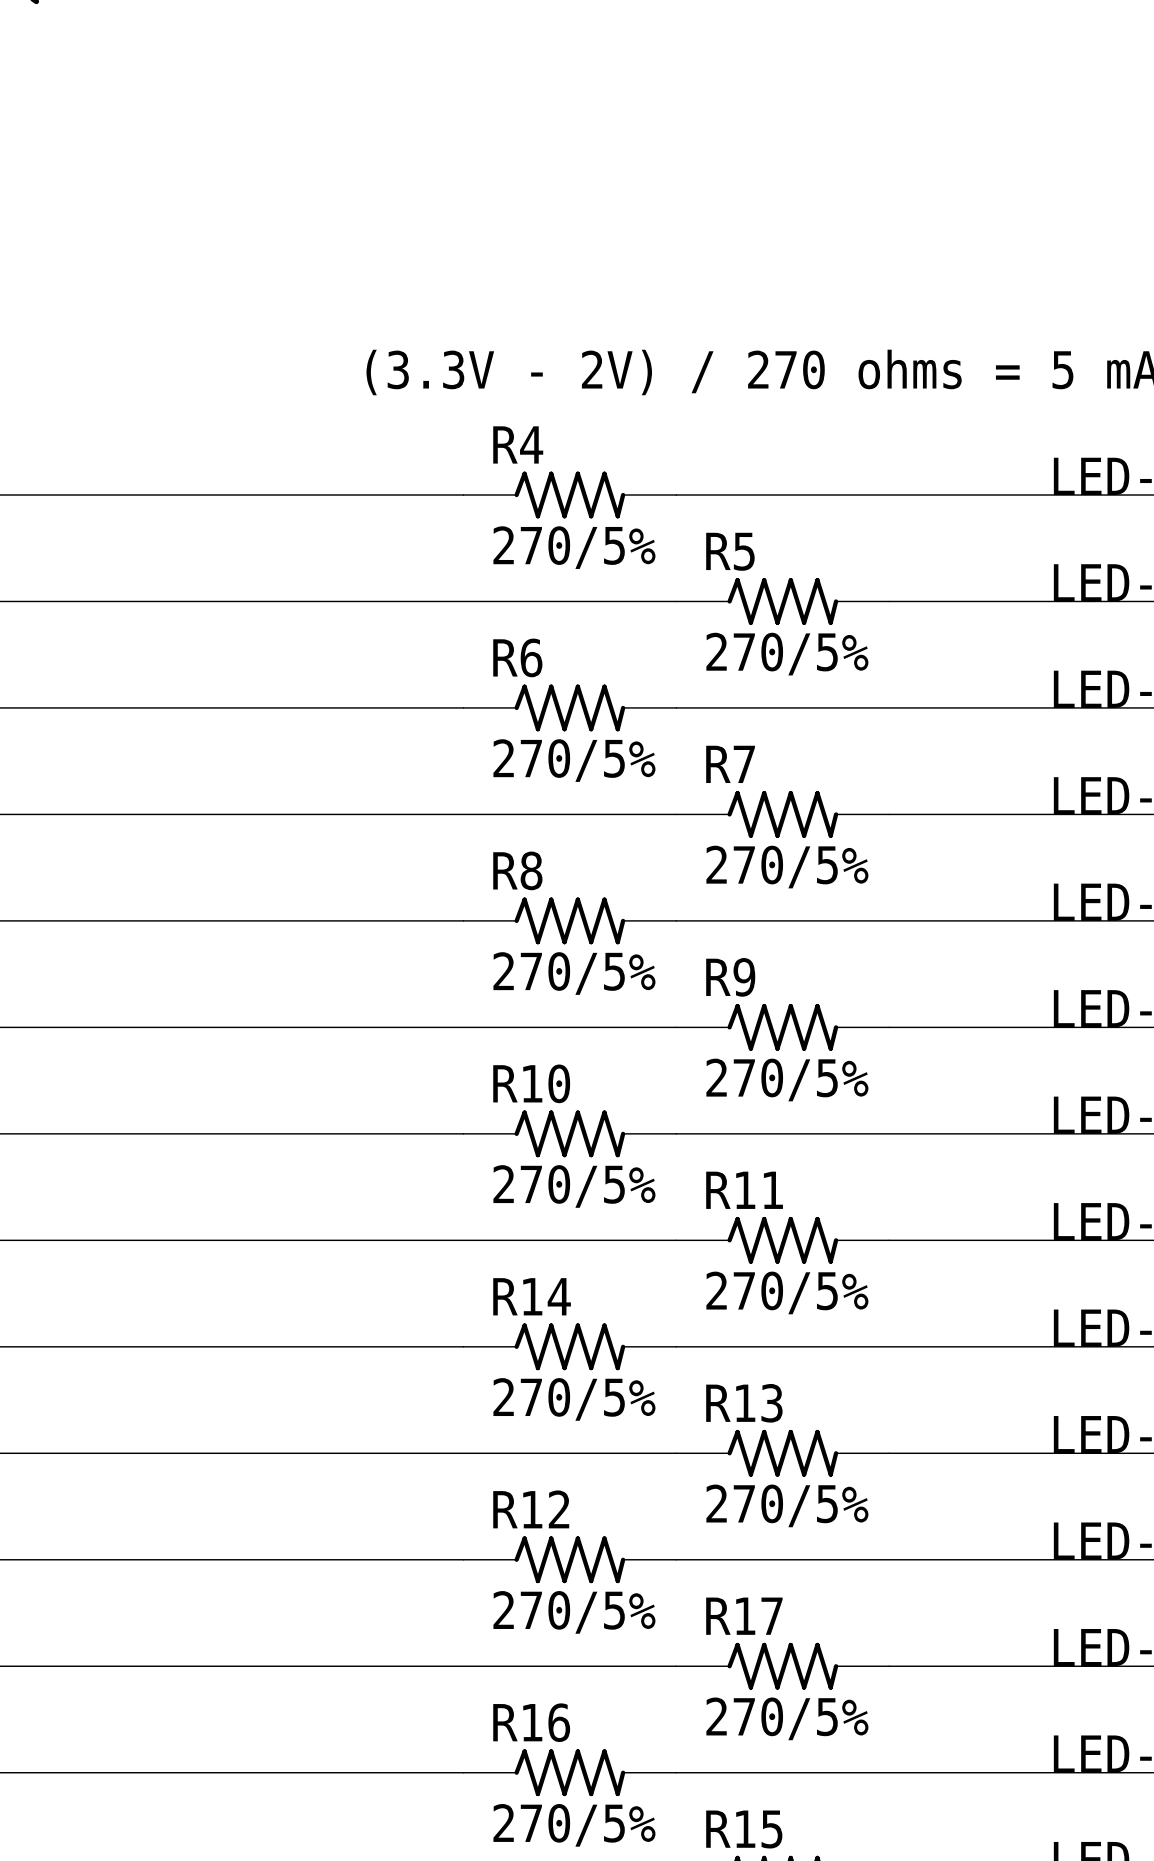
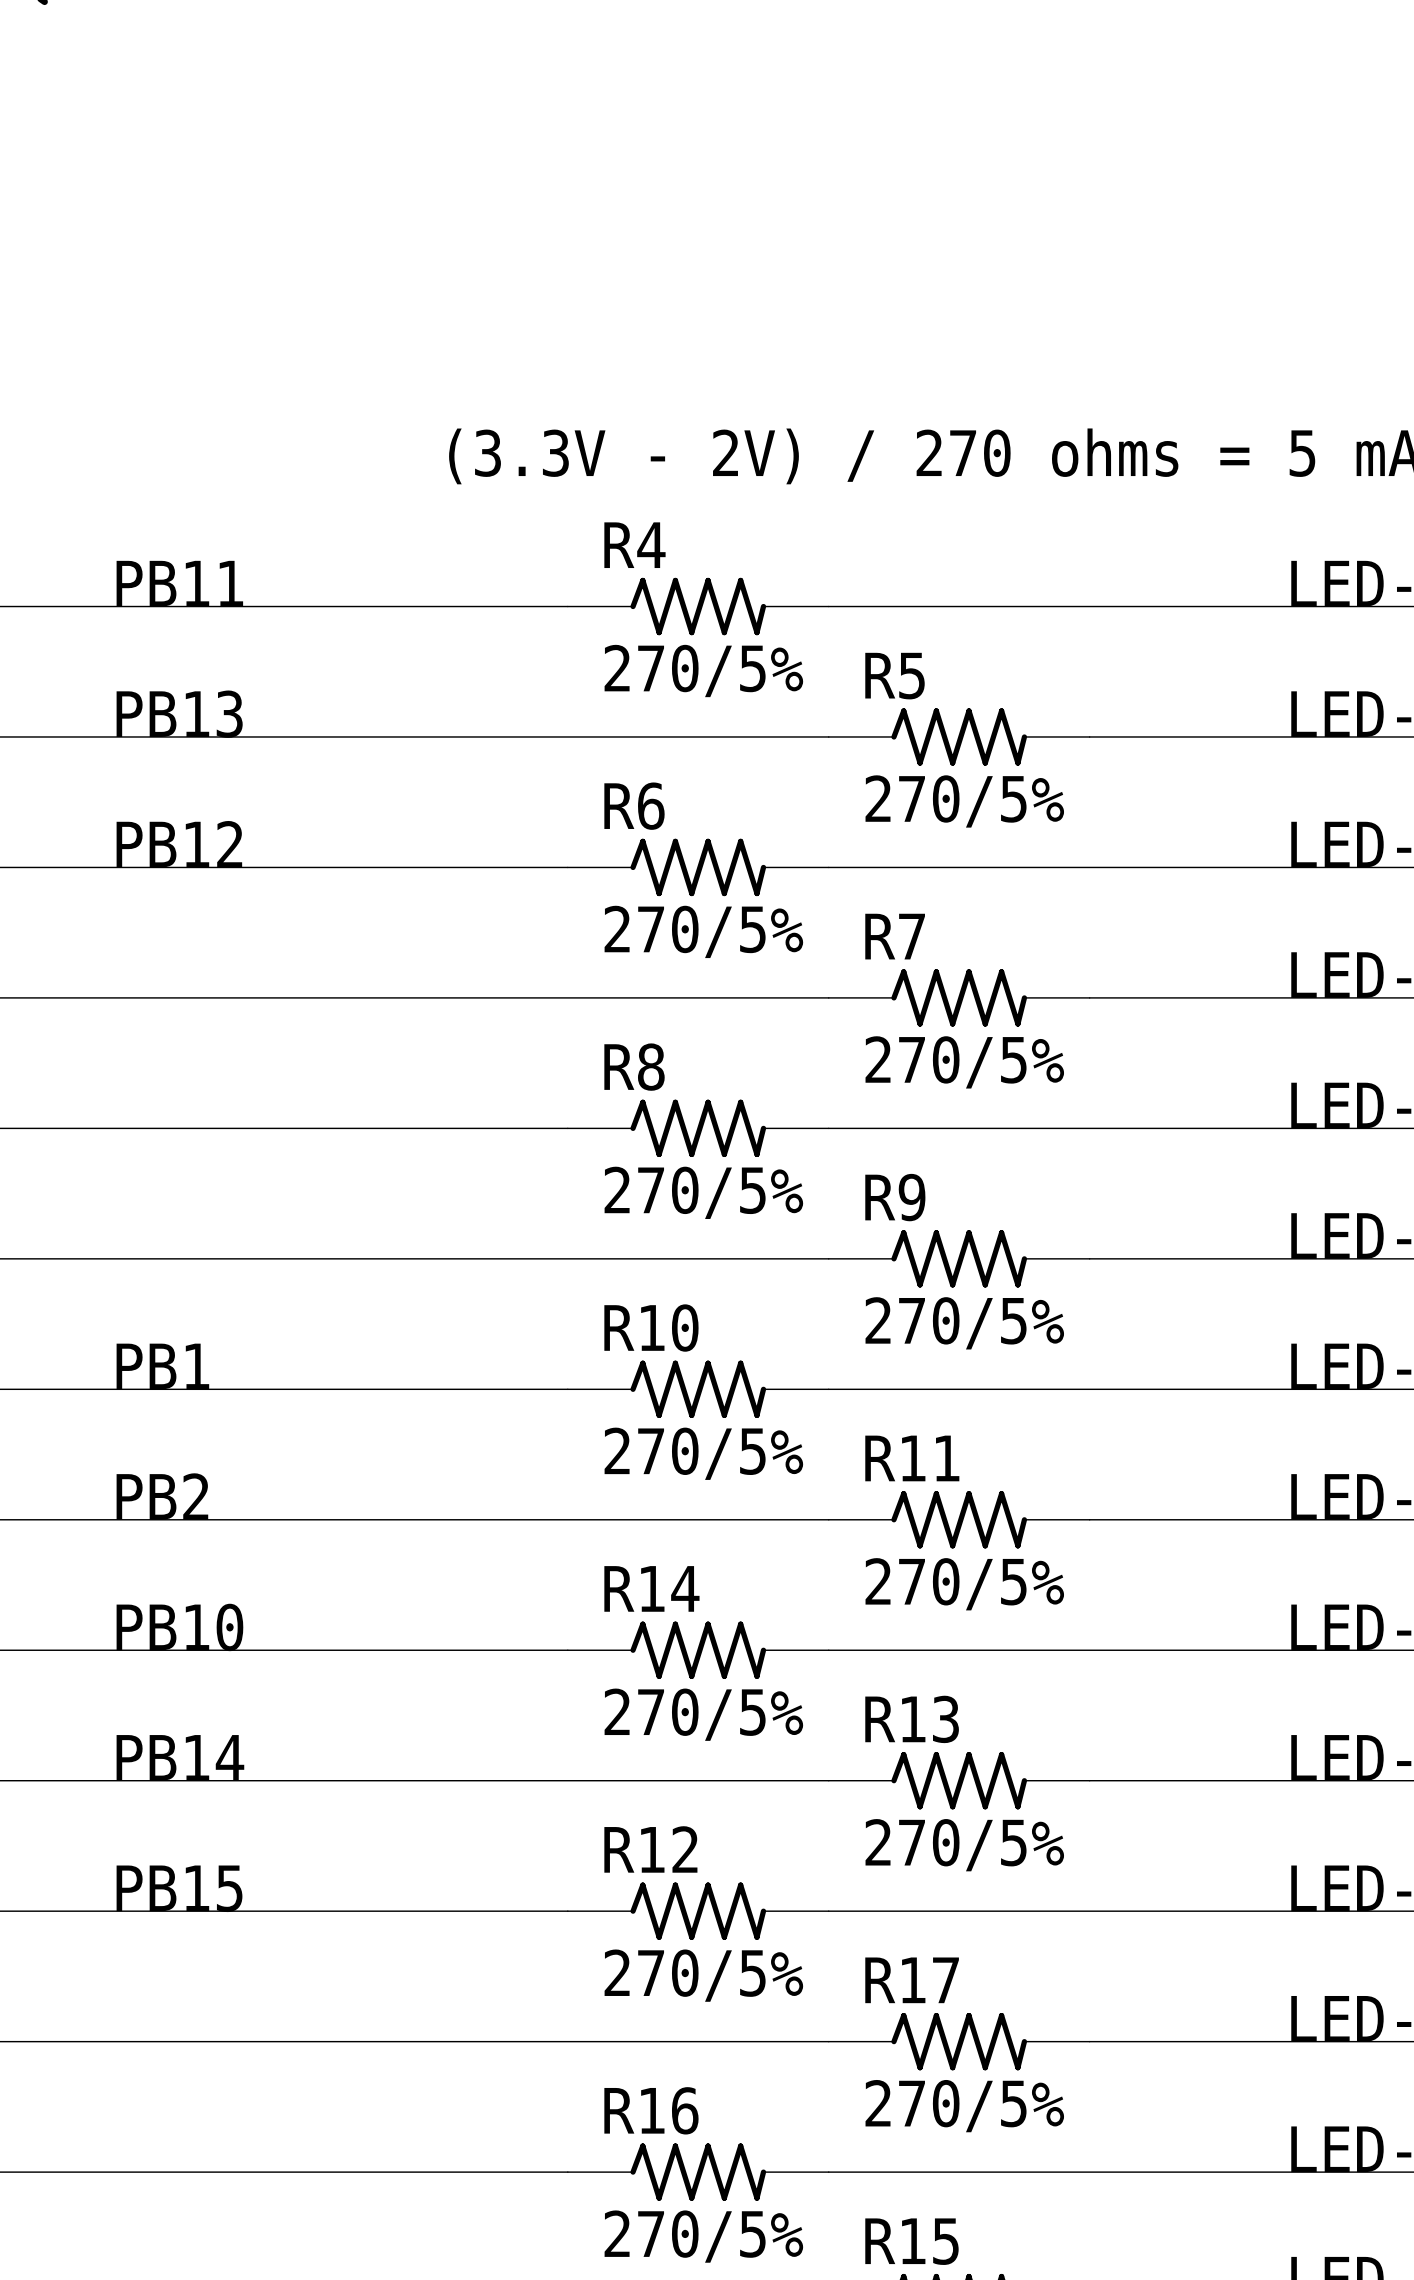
label: none -> PB11 (179, 583)
label: none -> PB13 (179, 714)
label: none -> PB12 (179, 844)
label: none -> PB1 (162, 1366)
label: none -> PB2 (162, 1496)
label: none -> PB10 (179, 1627)
label: none -> PB14 (180, 1757)
label: none -> PB15 (179, 1888)

